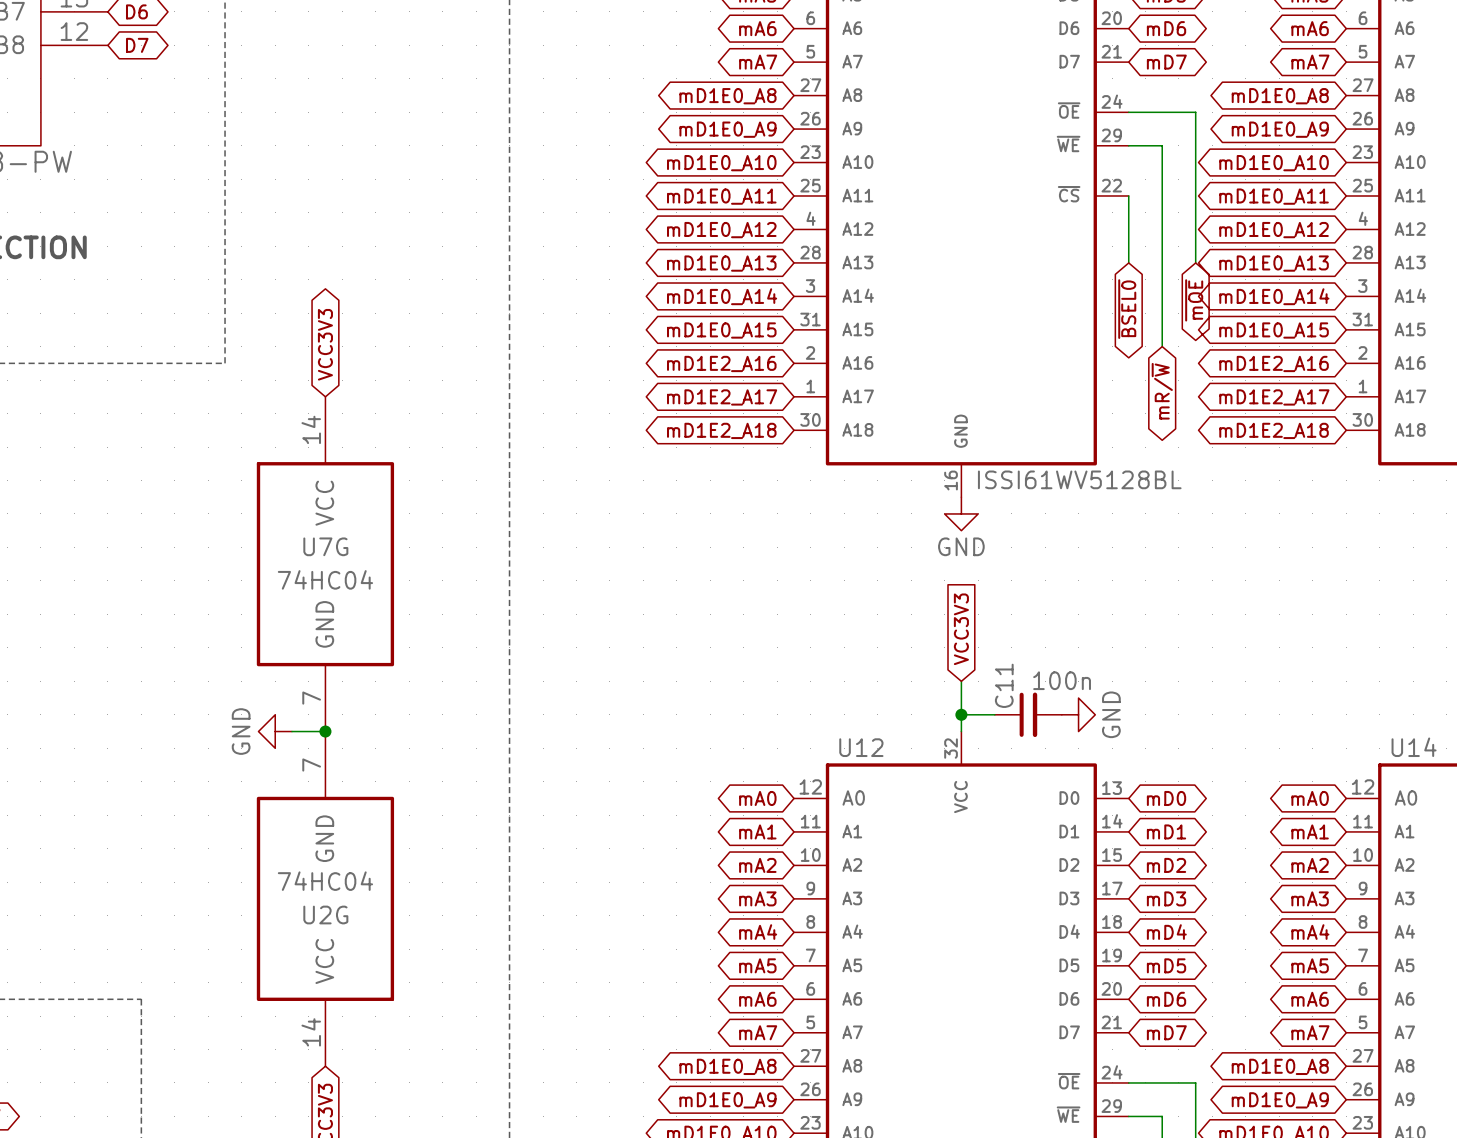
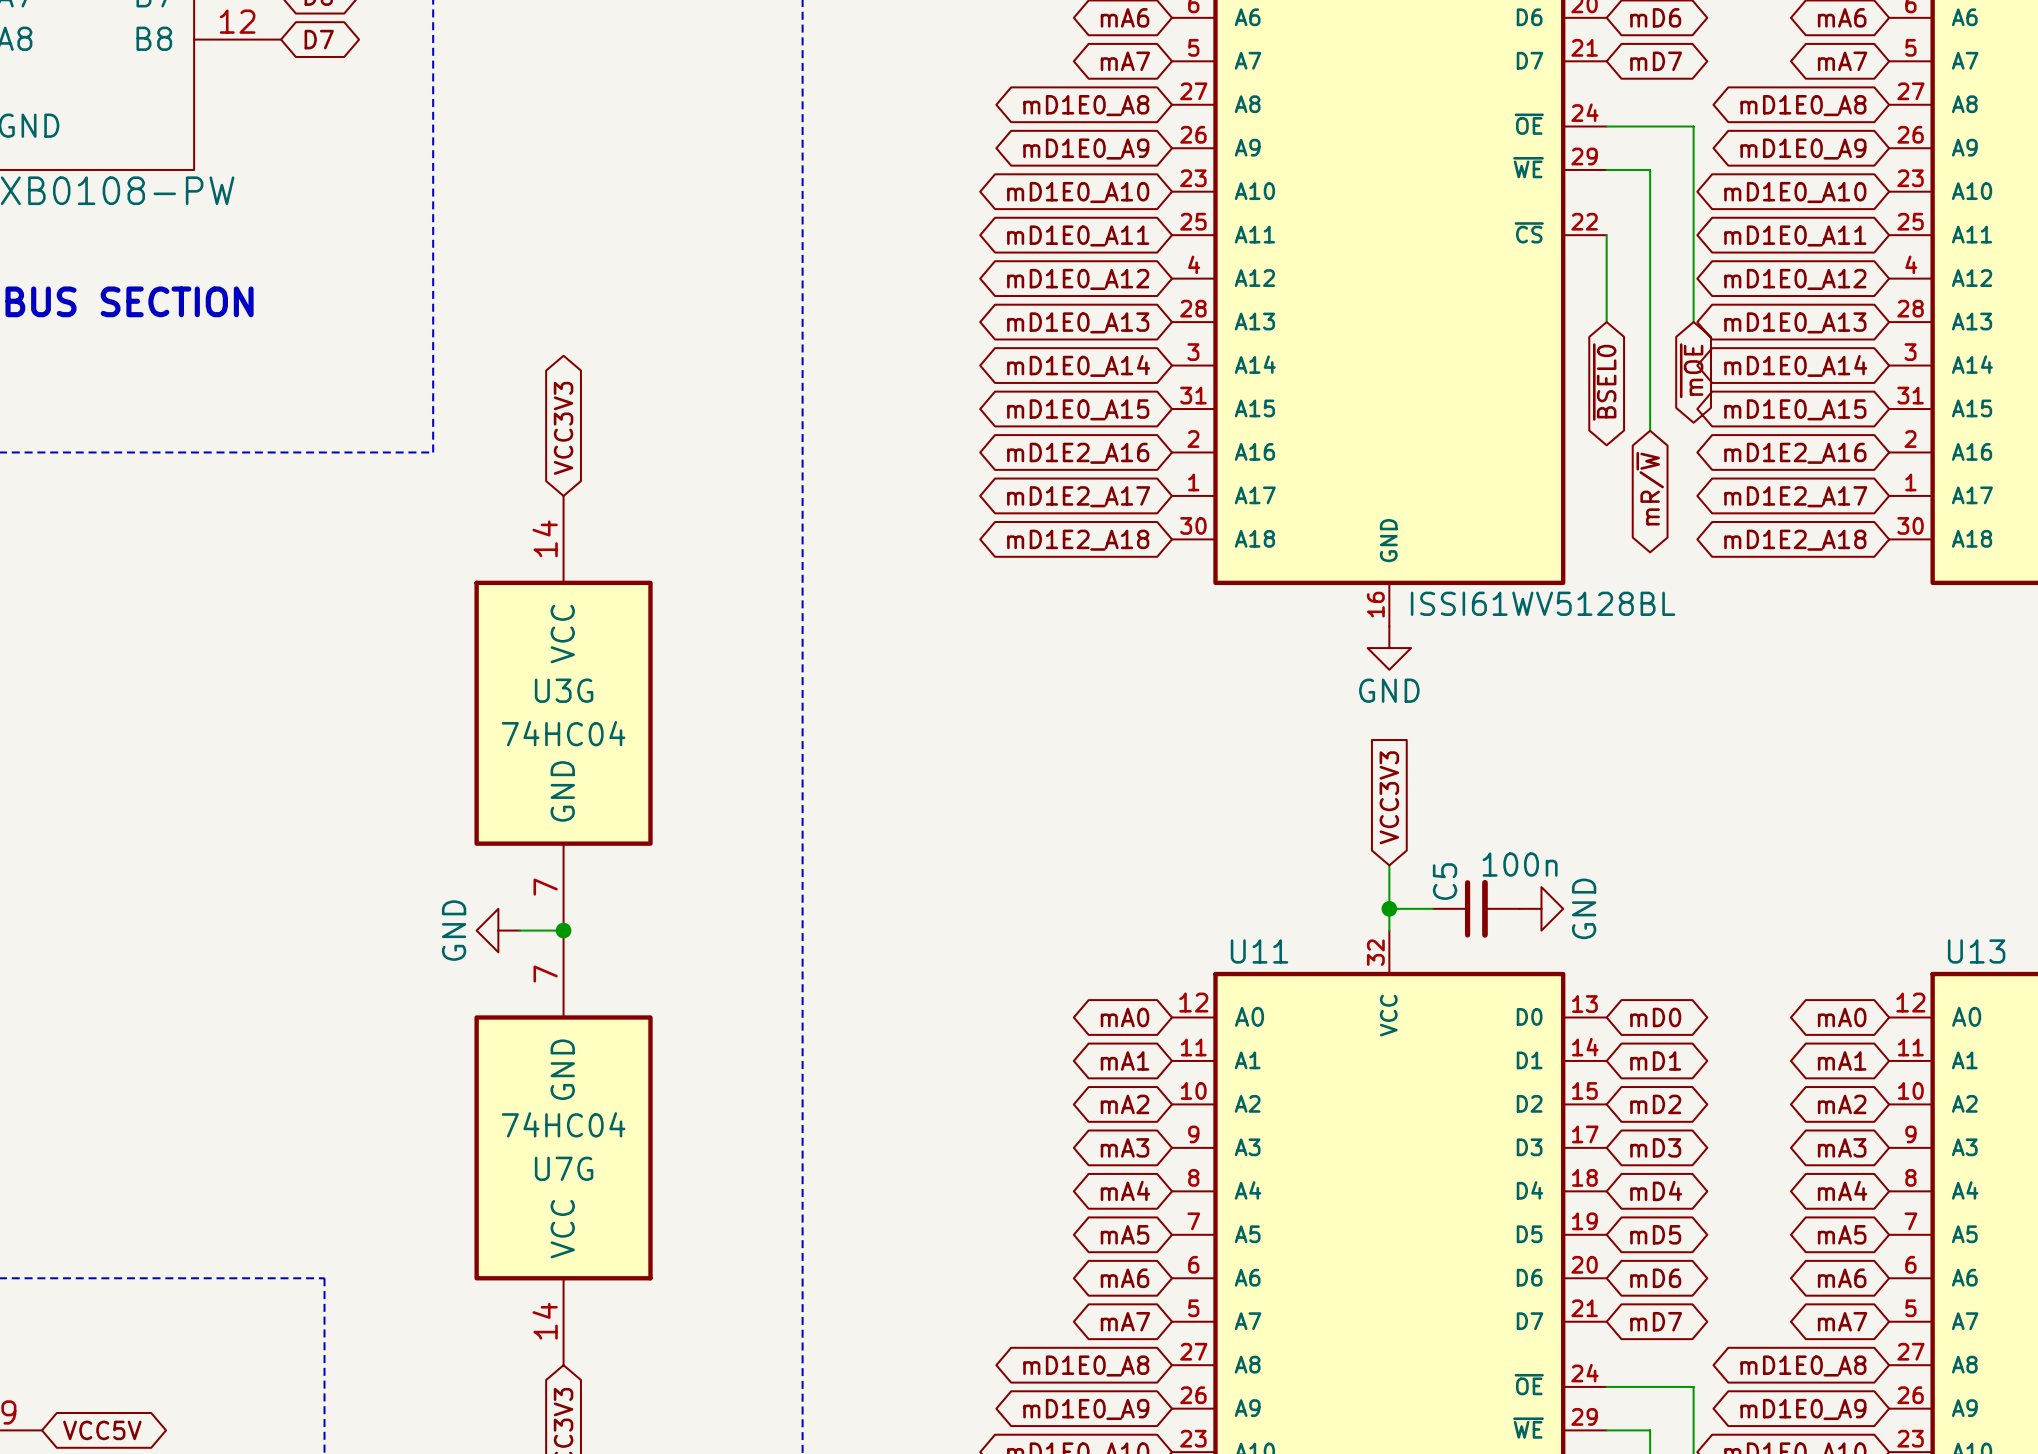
U7G name: U7G (325, 546) -> U3G (564, 690)
C11 name: C11 (1004, 685) -> C5 (1445, 881)
U12 name: U12 (861, 747) -> U11 (1259, 951)
U14 name: U14 (1414, 747) -> U13 (1976, 951)
U2G name: U2G (325, 915) -> U7G (564, 1168)

